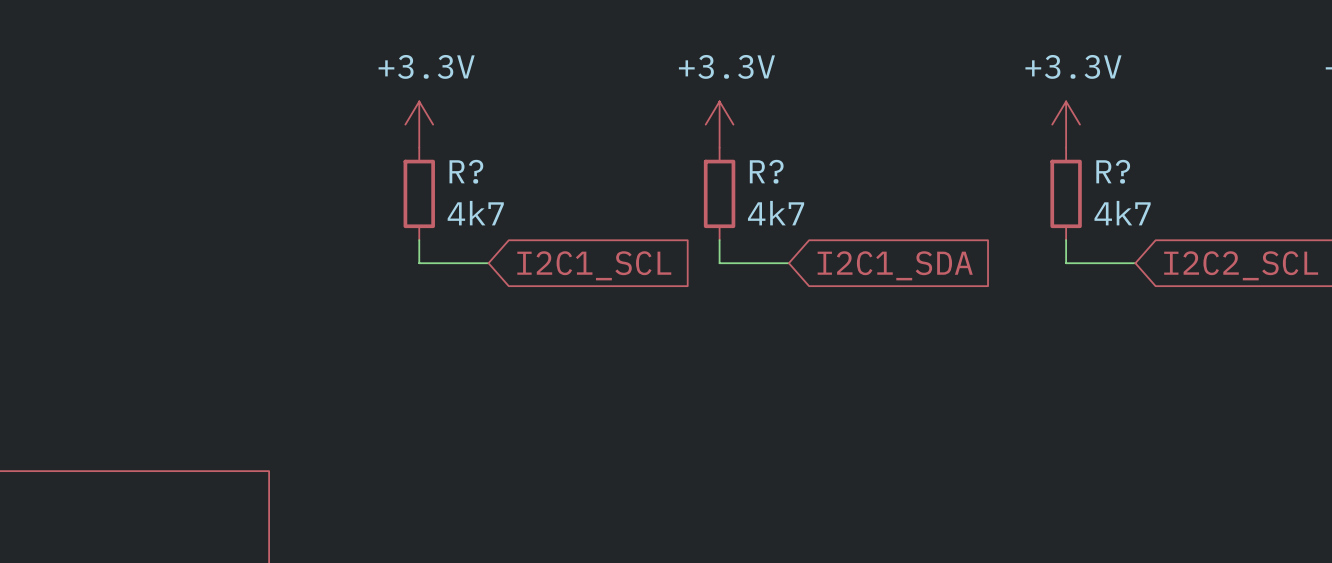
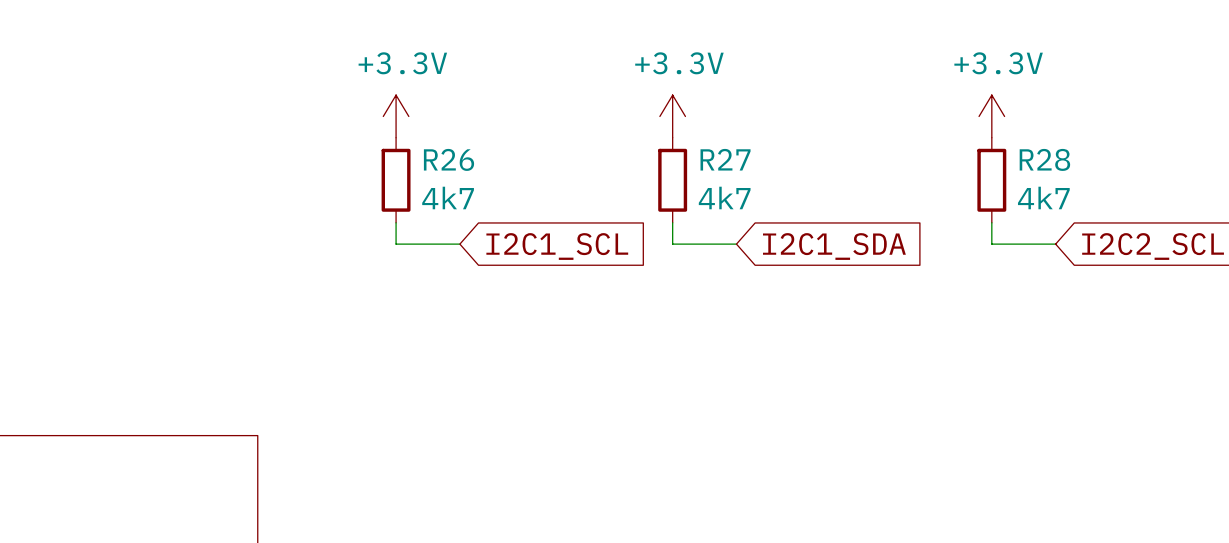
R? name: R? (466, 171) -> R26 (449, 159)
R? name: R? (766, 171) -> R27 (725, 159)
R? name: R? (1113, 171) -> R28 (1044, 159)

